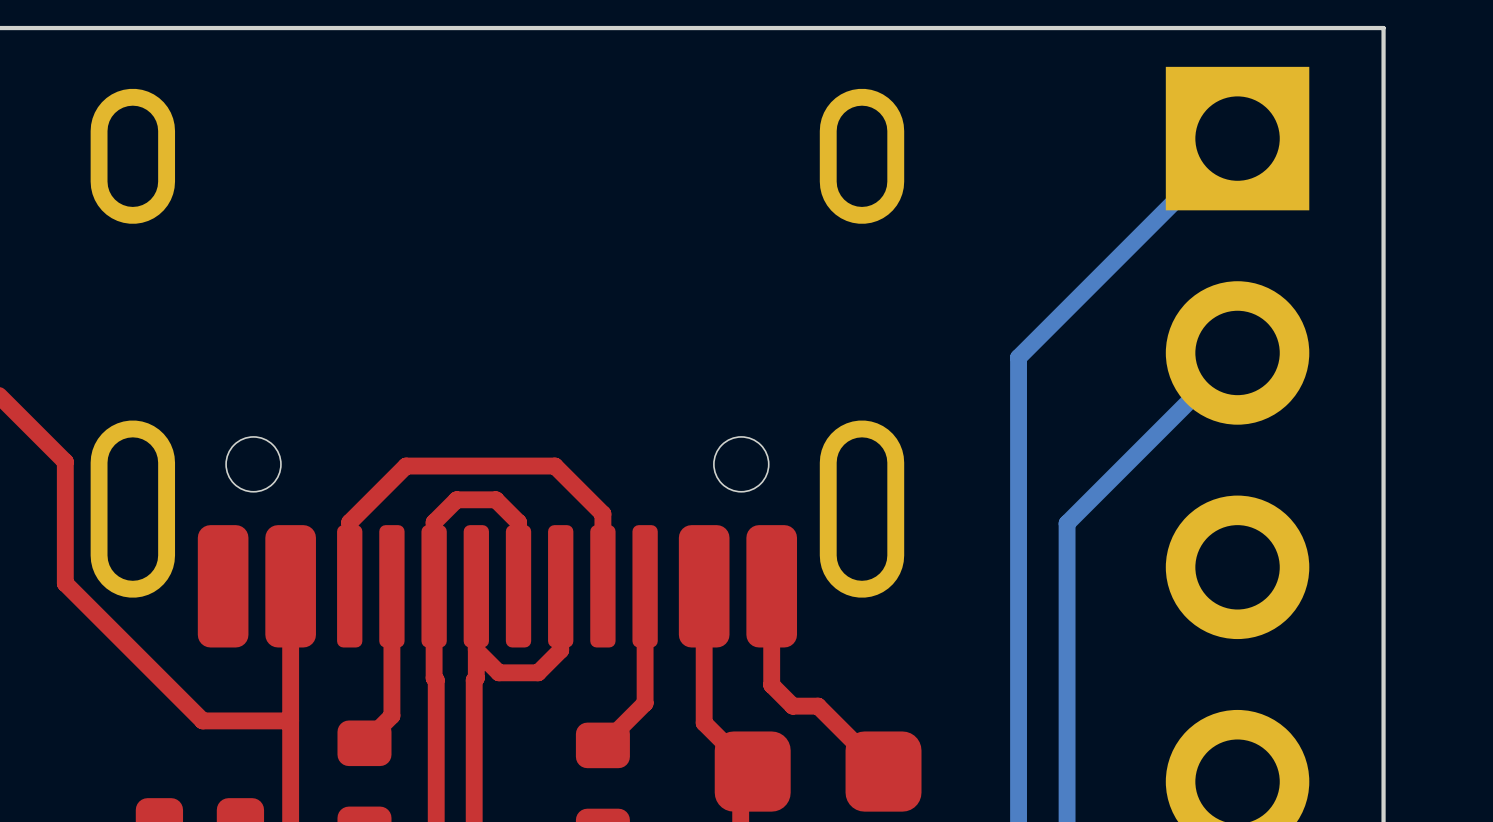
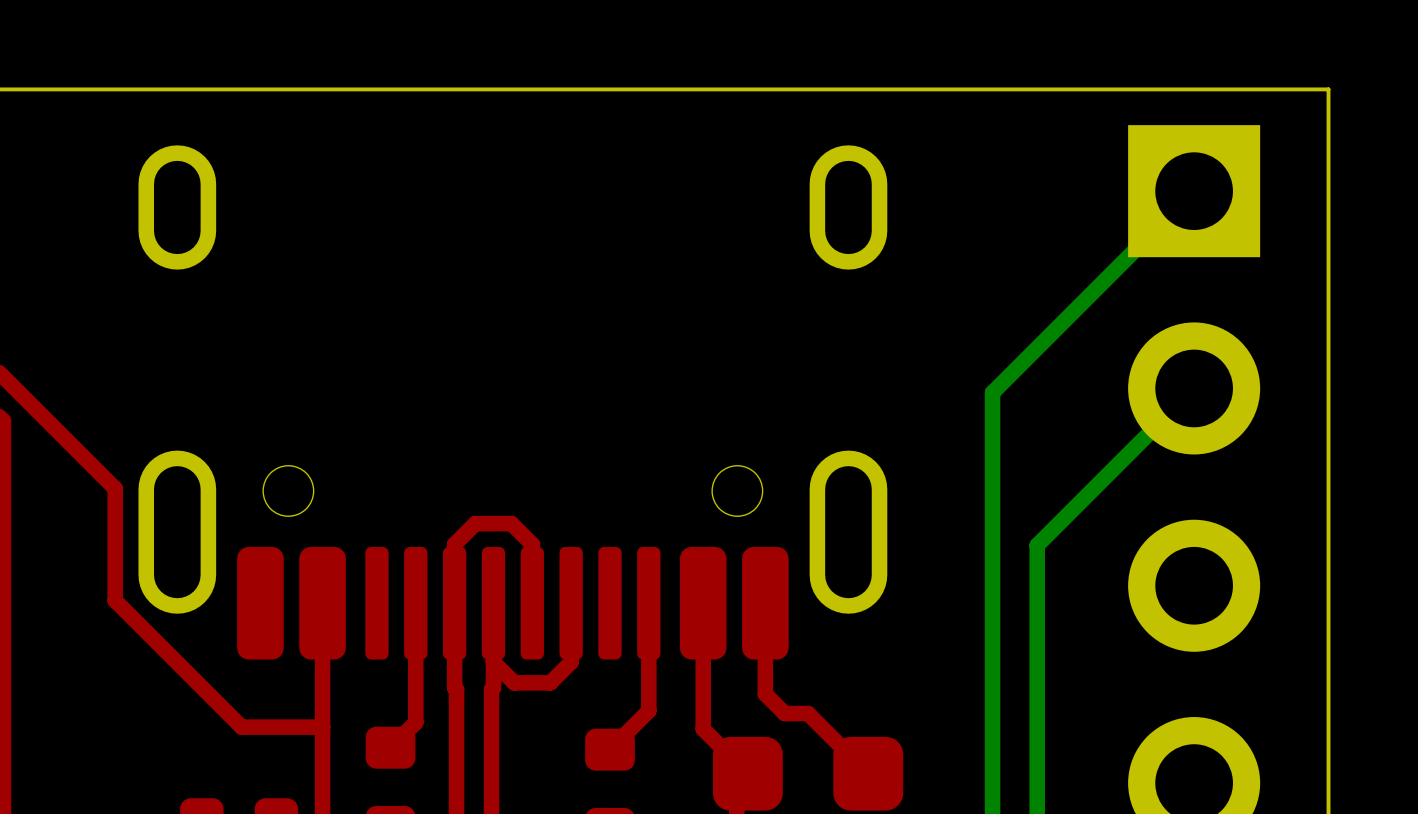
top track: (602, 586) (602, 513) (555, 466) (406, 466) (349, 522) (349, 586) -> none

